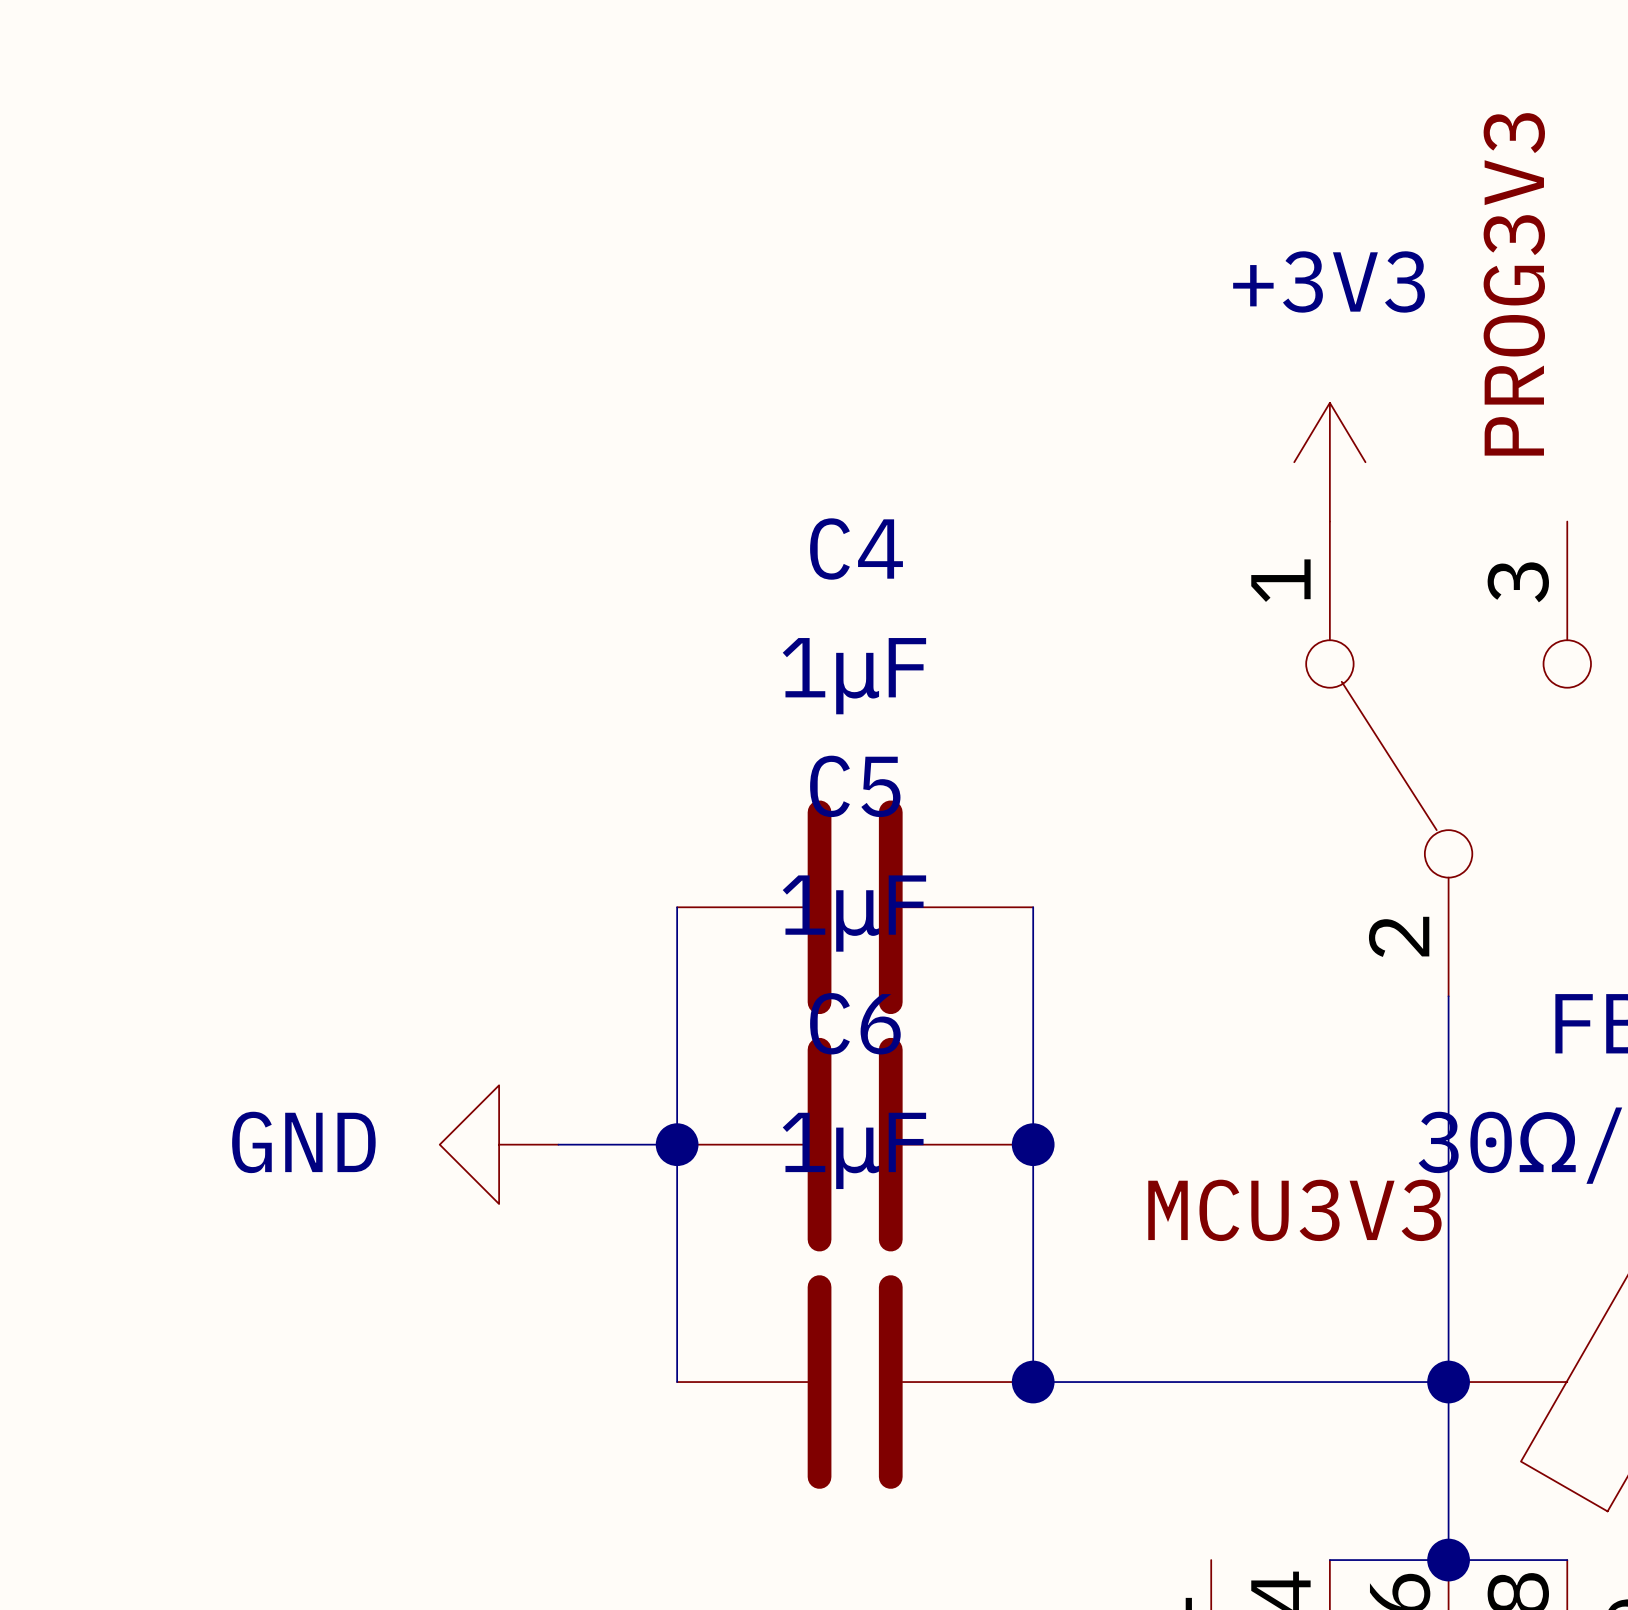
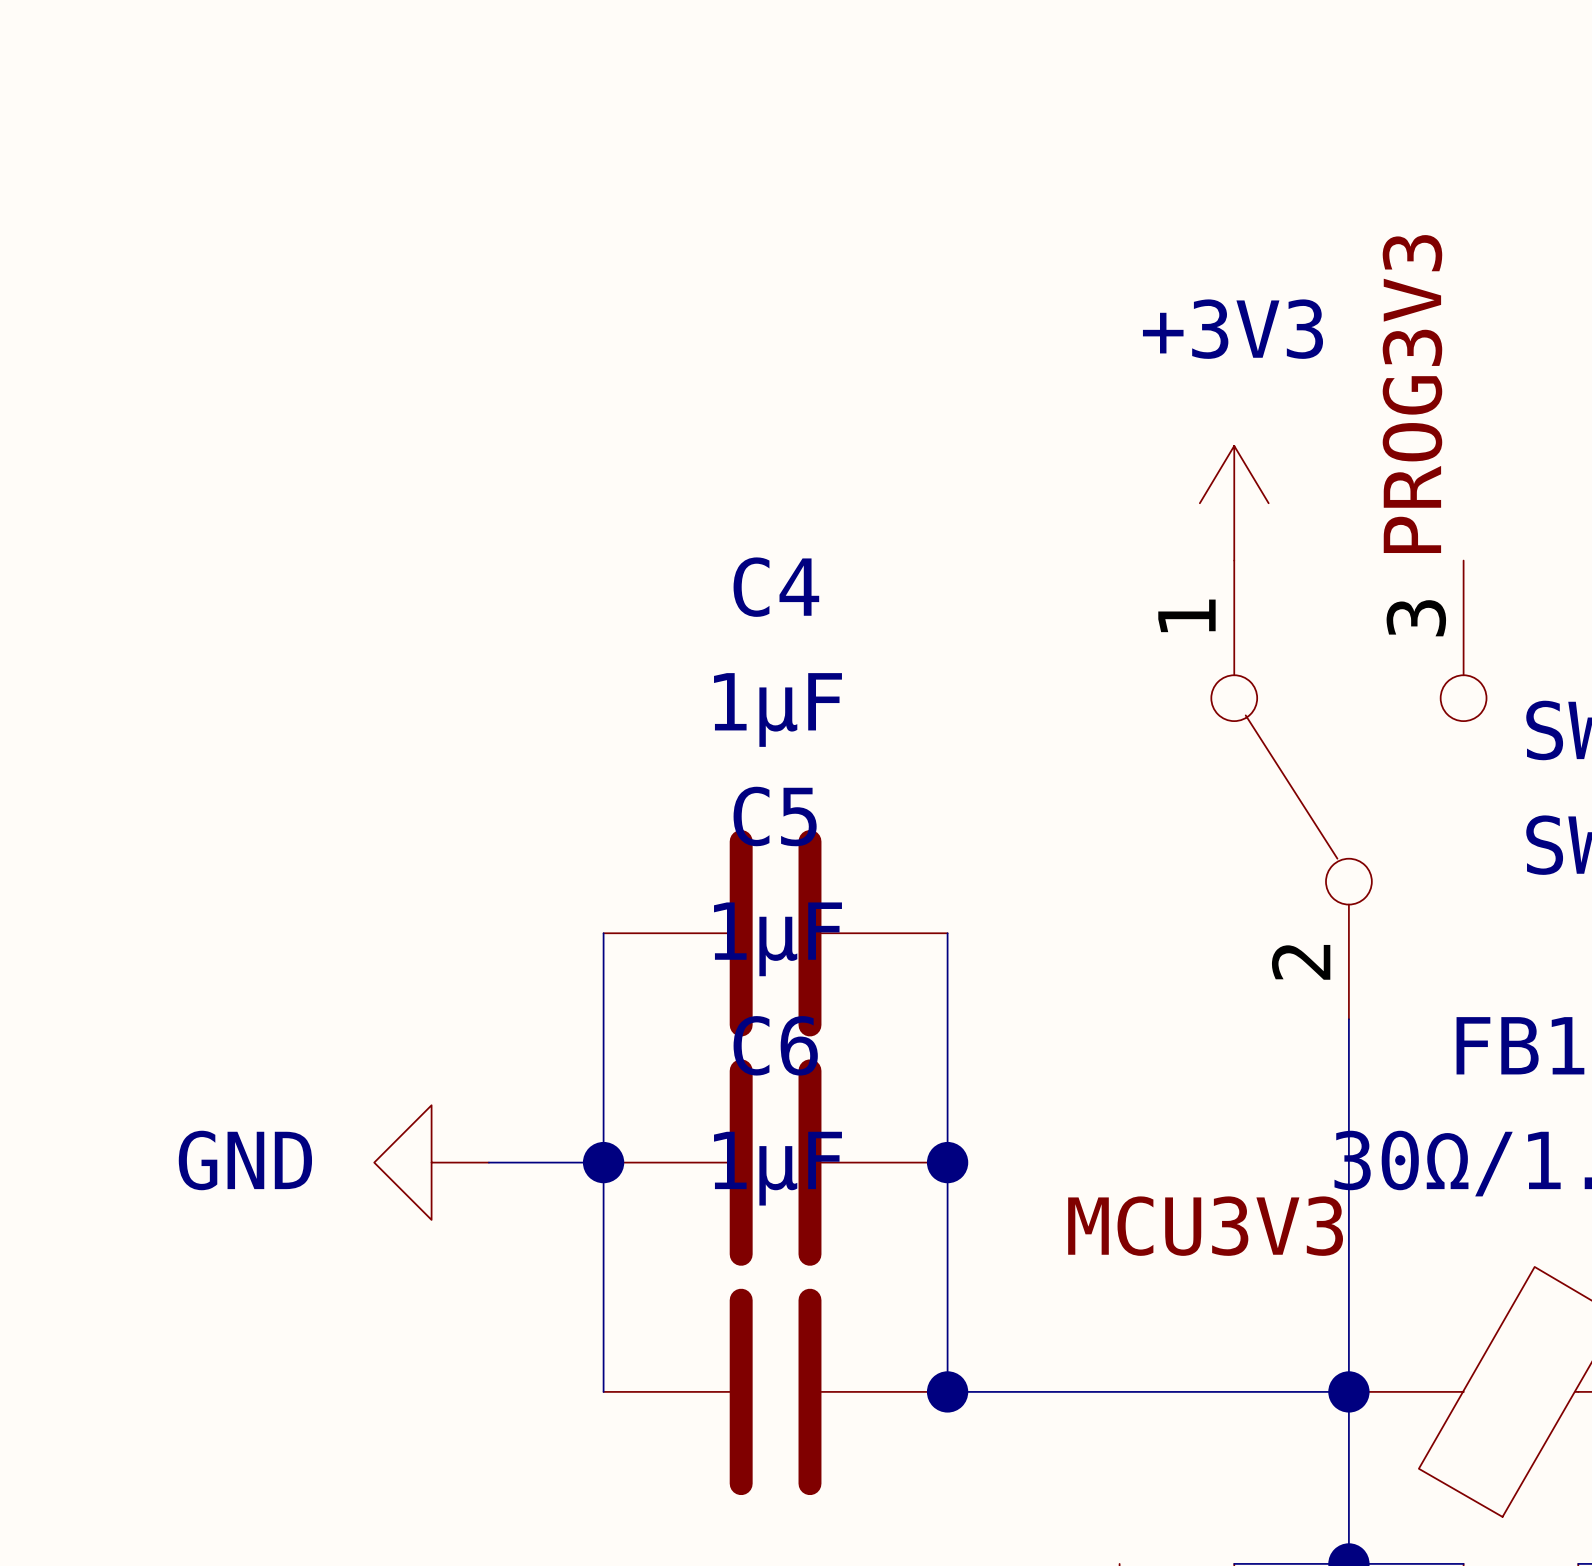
label position: PROG3V3 (1514, 284) -> PROG3V3 (1412, 394)

